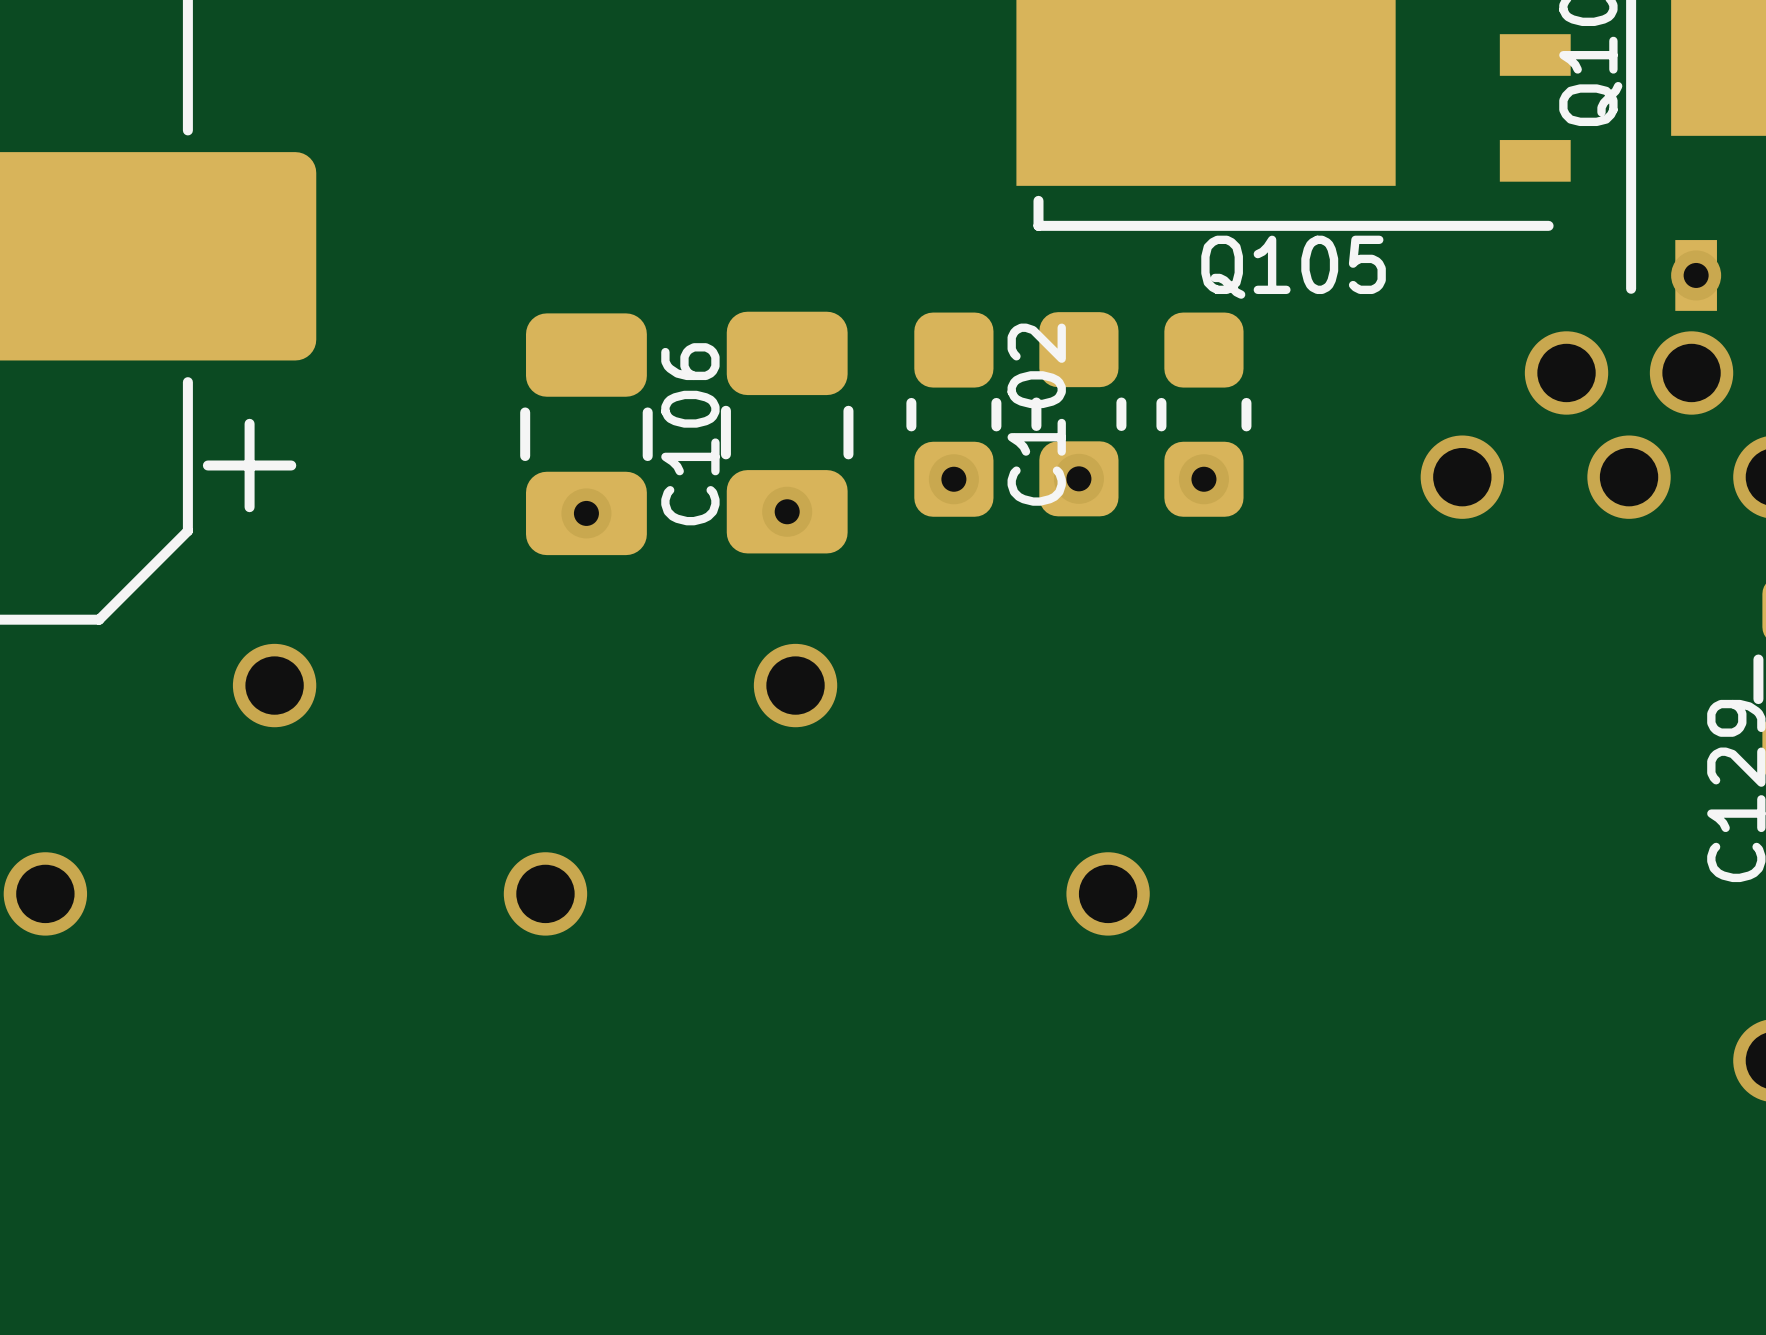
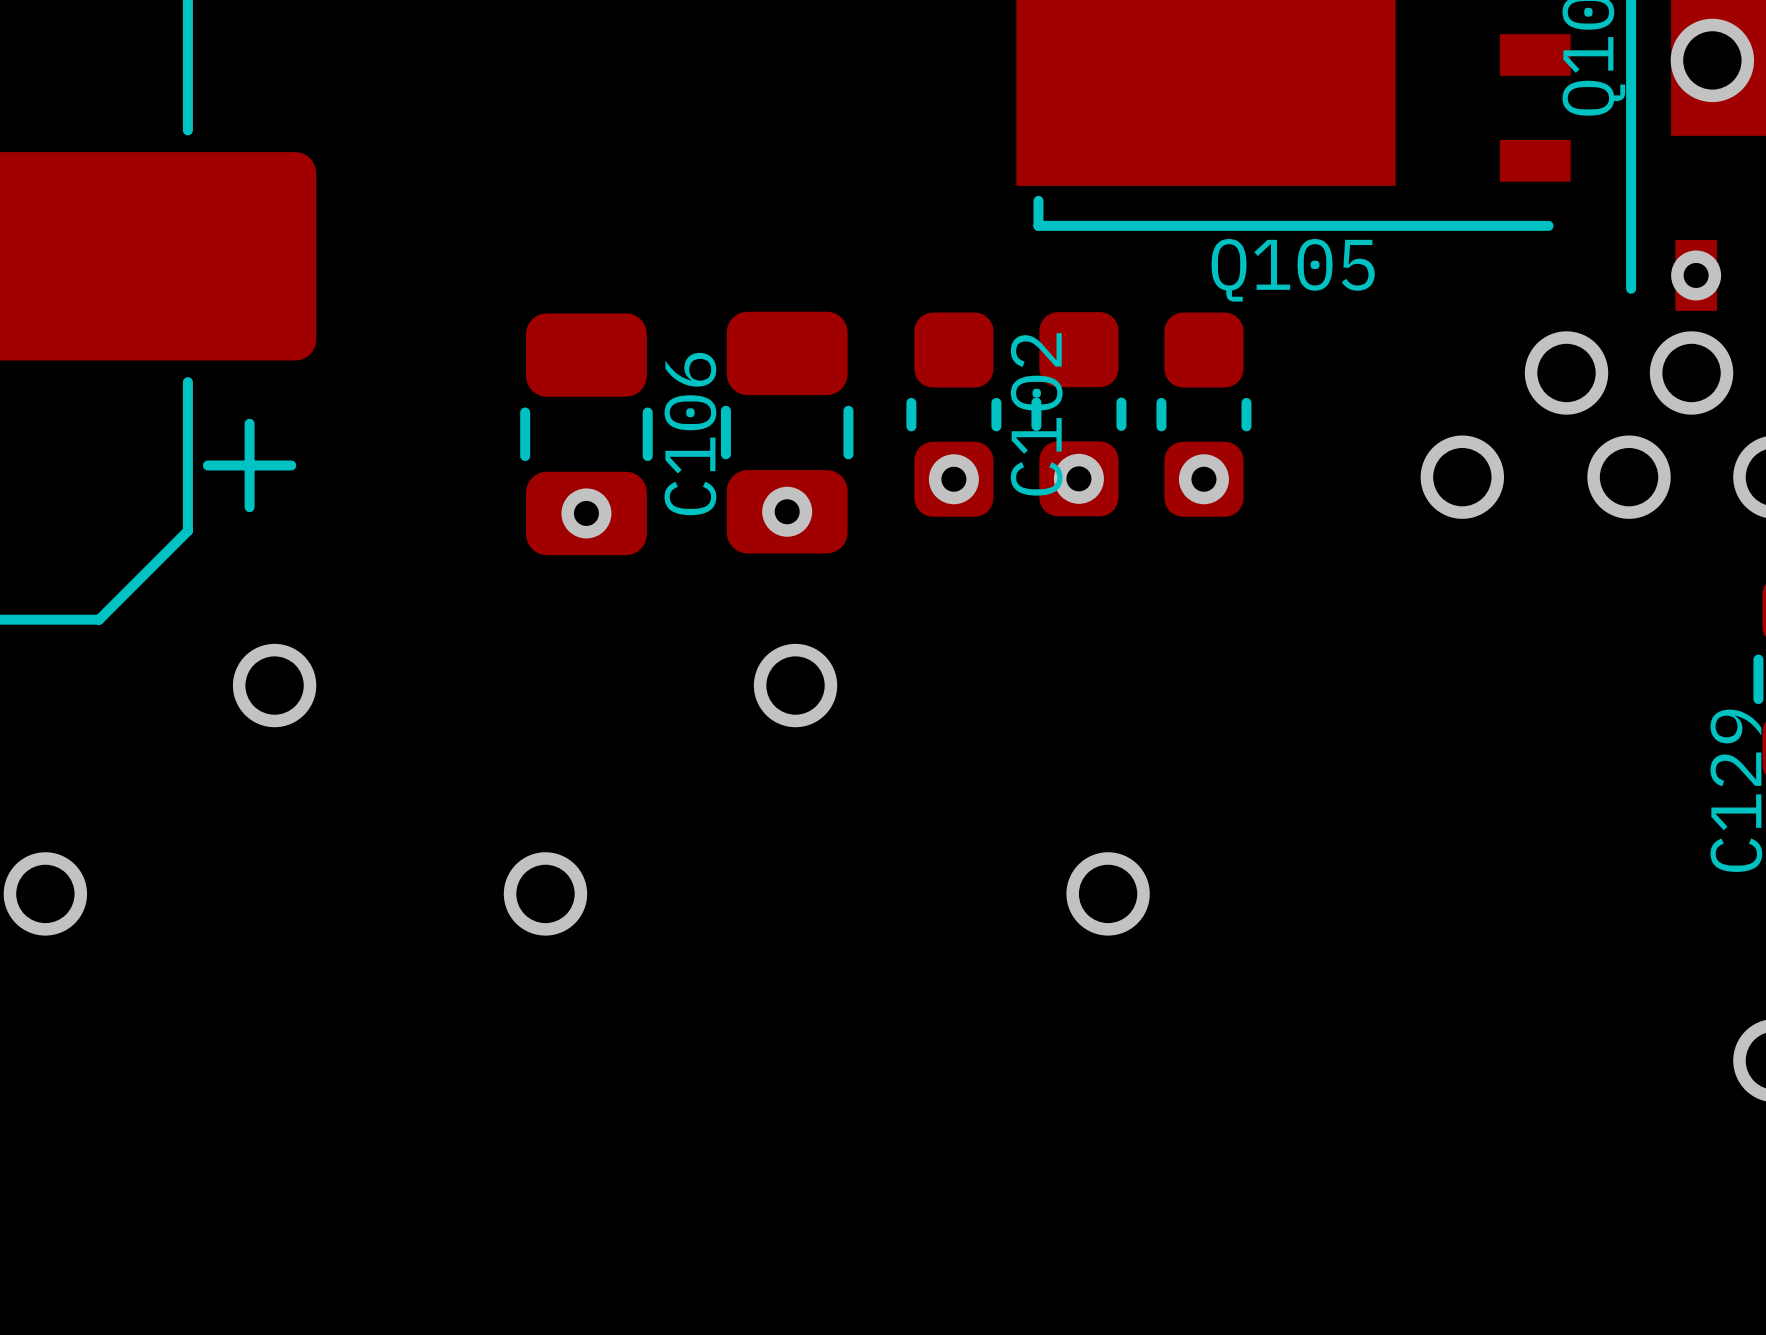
via: none -> (1712, 60)

